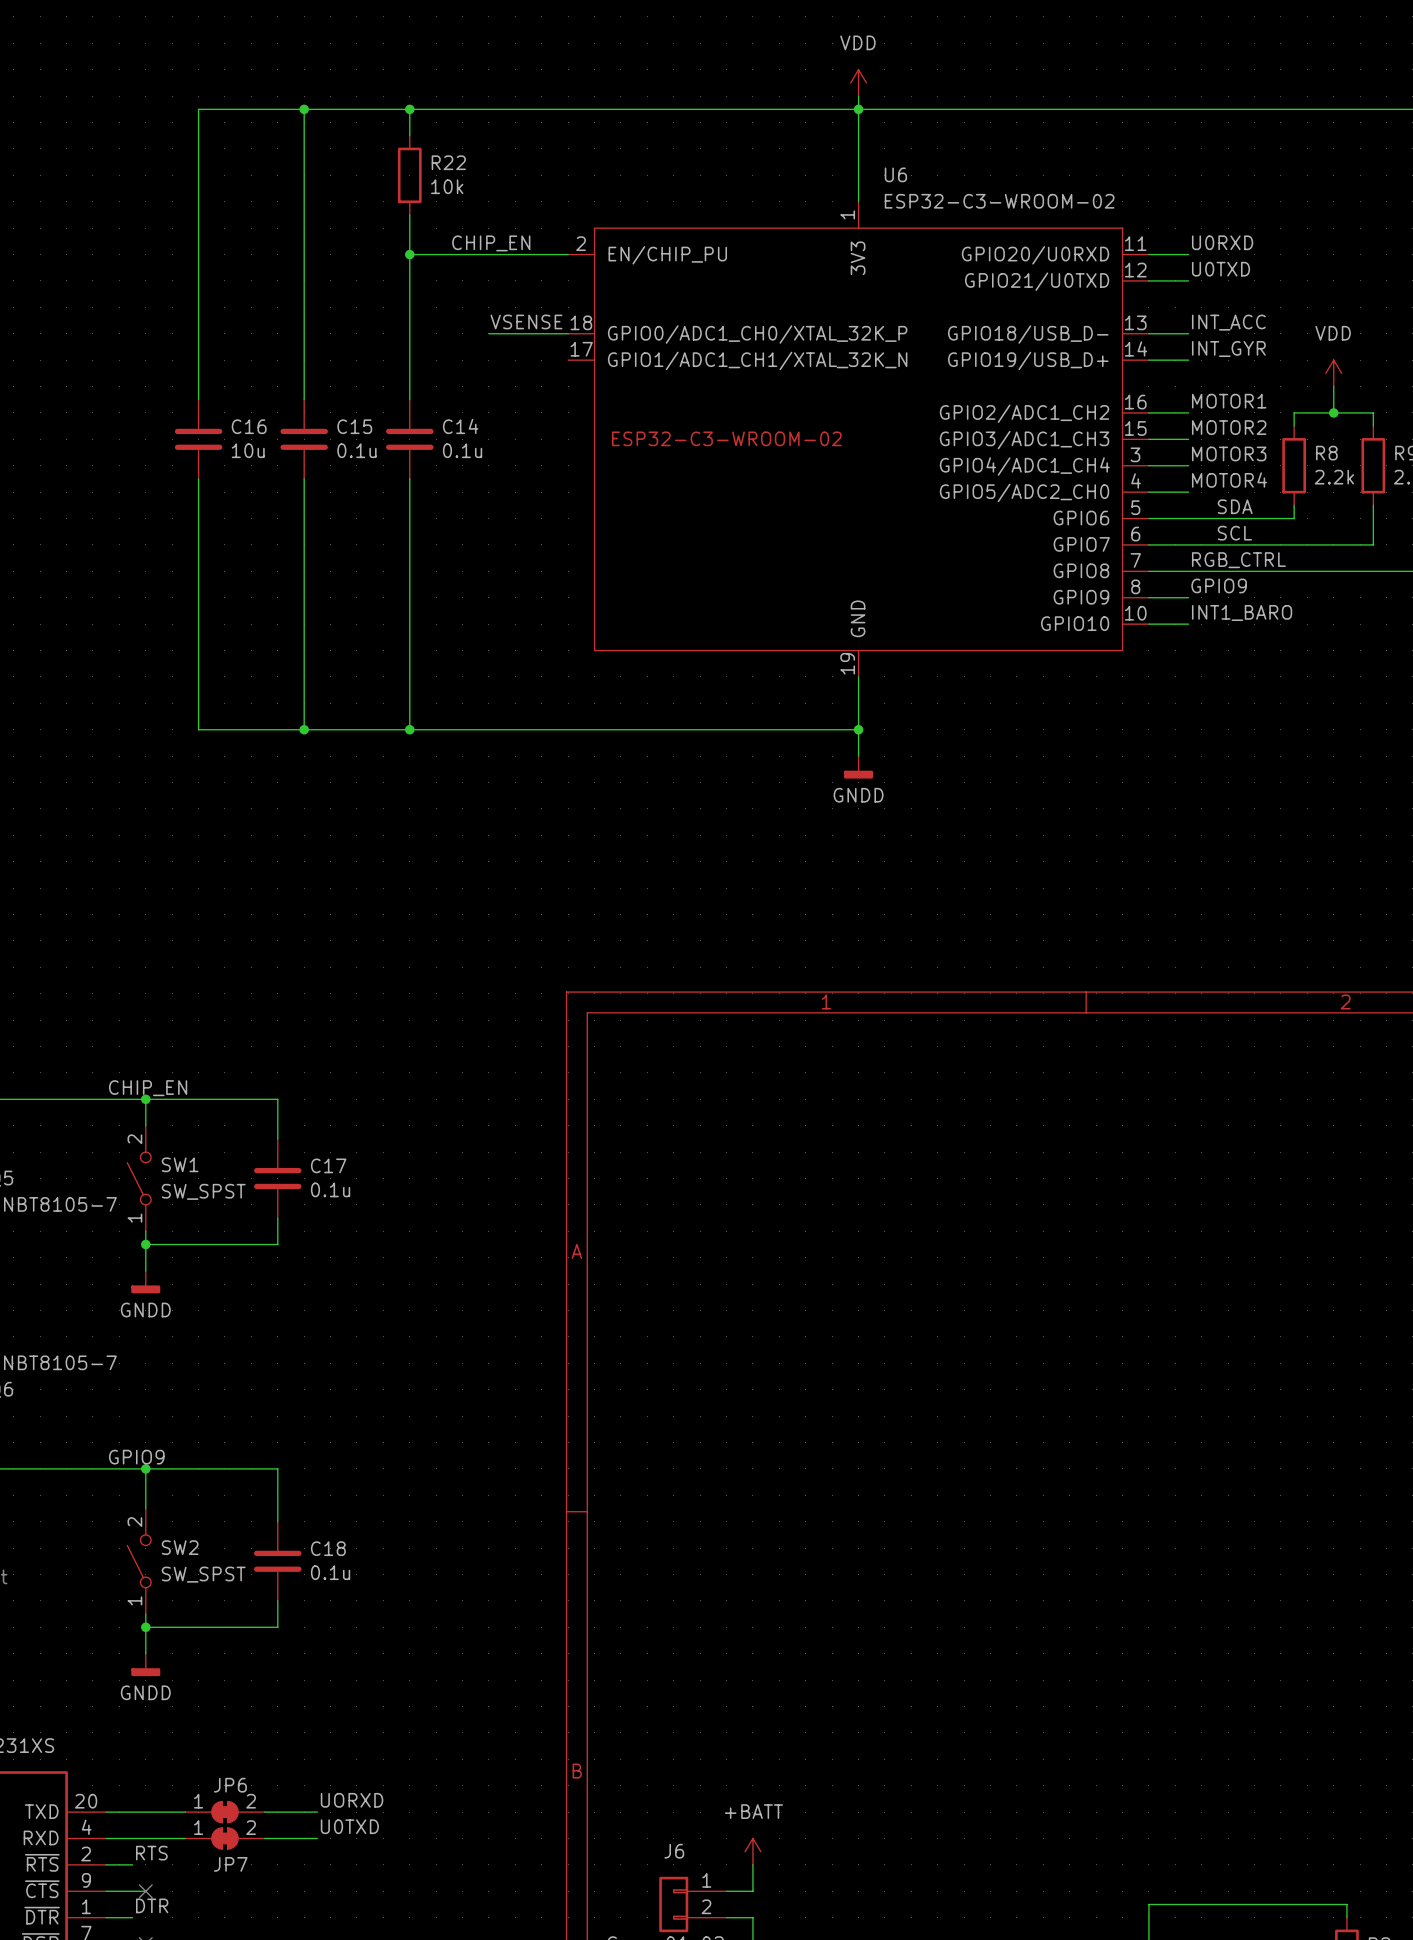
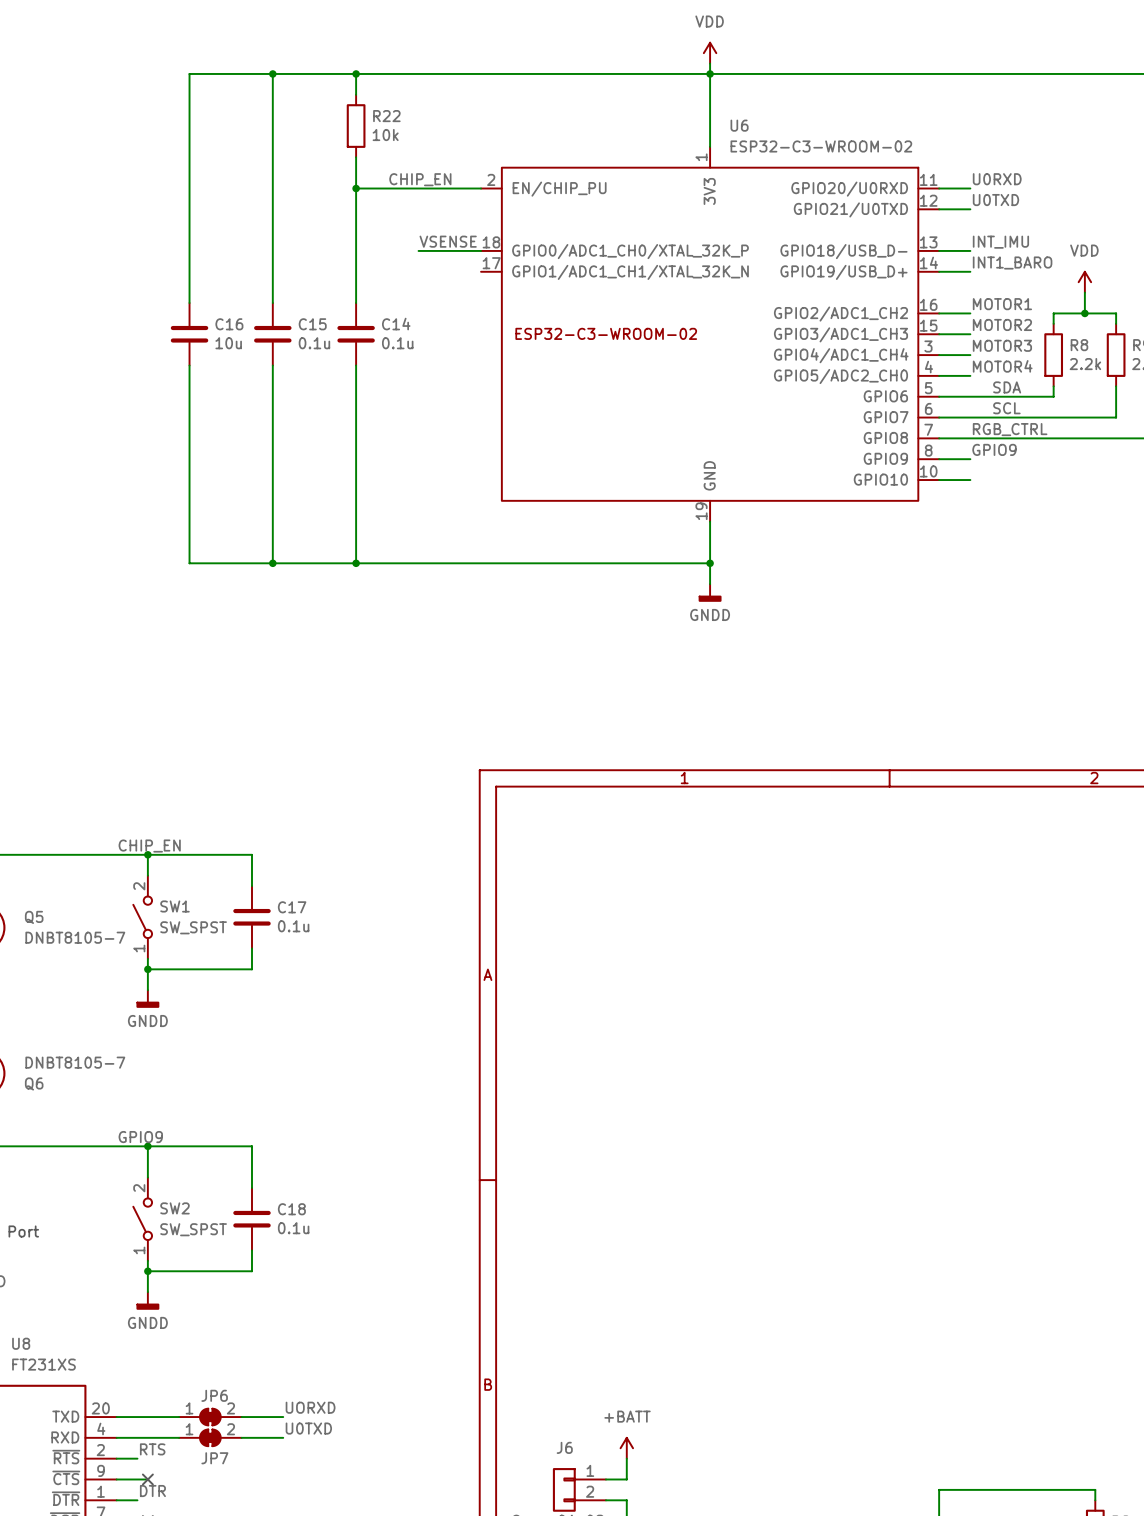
label: INT_ACC (1228, 322) -> INT_IMU (1000, 242)
label: INT_GYR (1228, 349) -> INT1_BARO (1012, 263)
label: INT1_BARO (1242, 612) -> none

